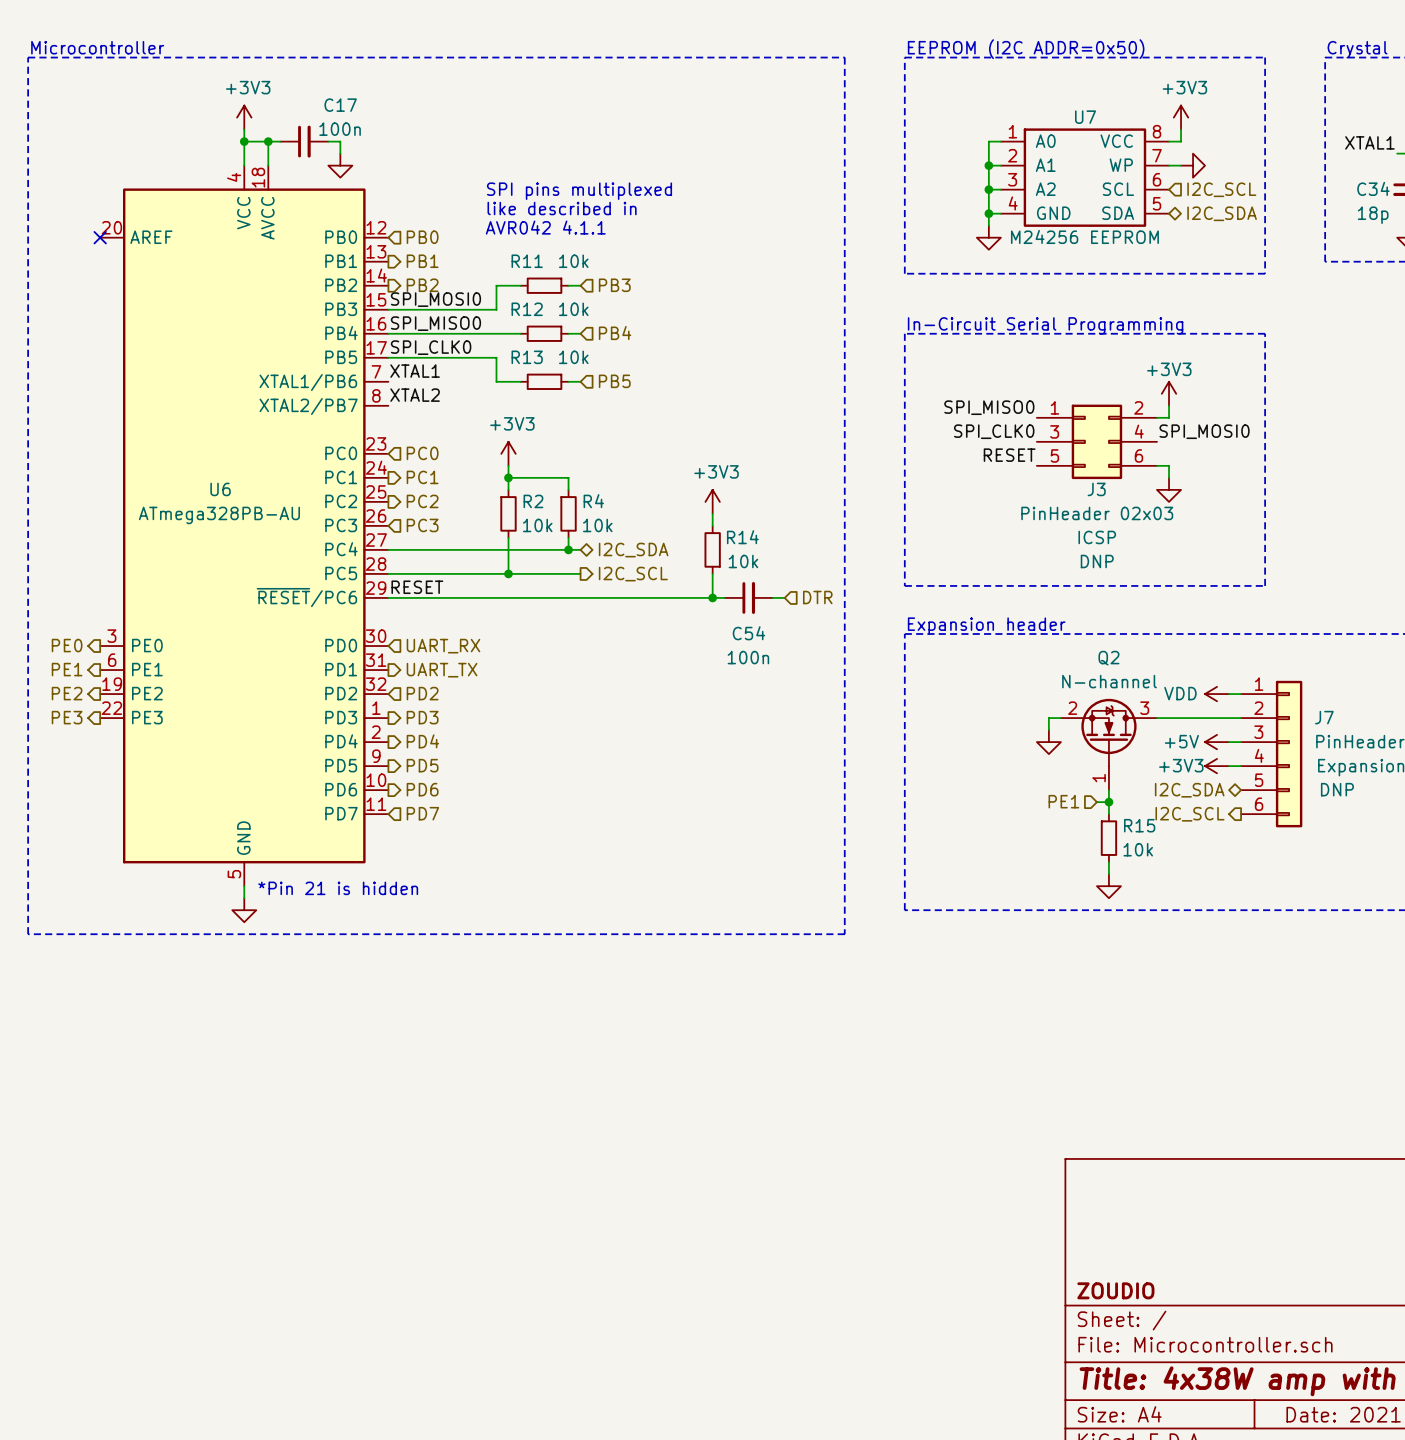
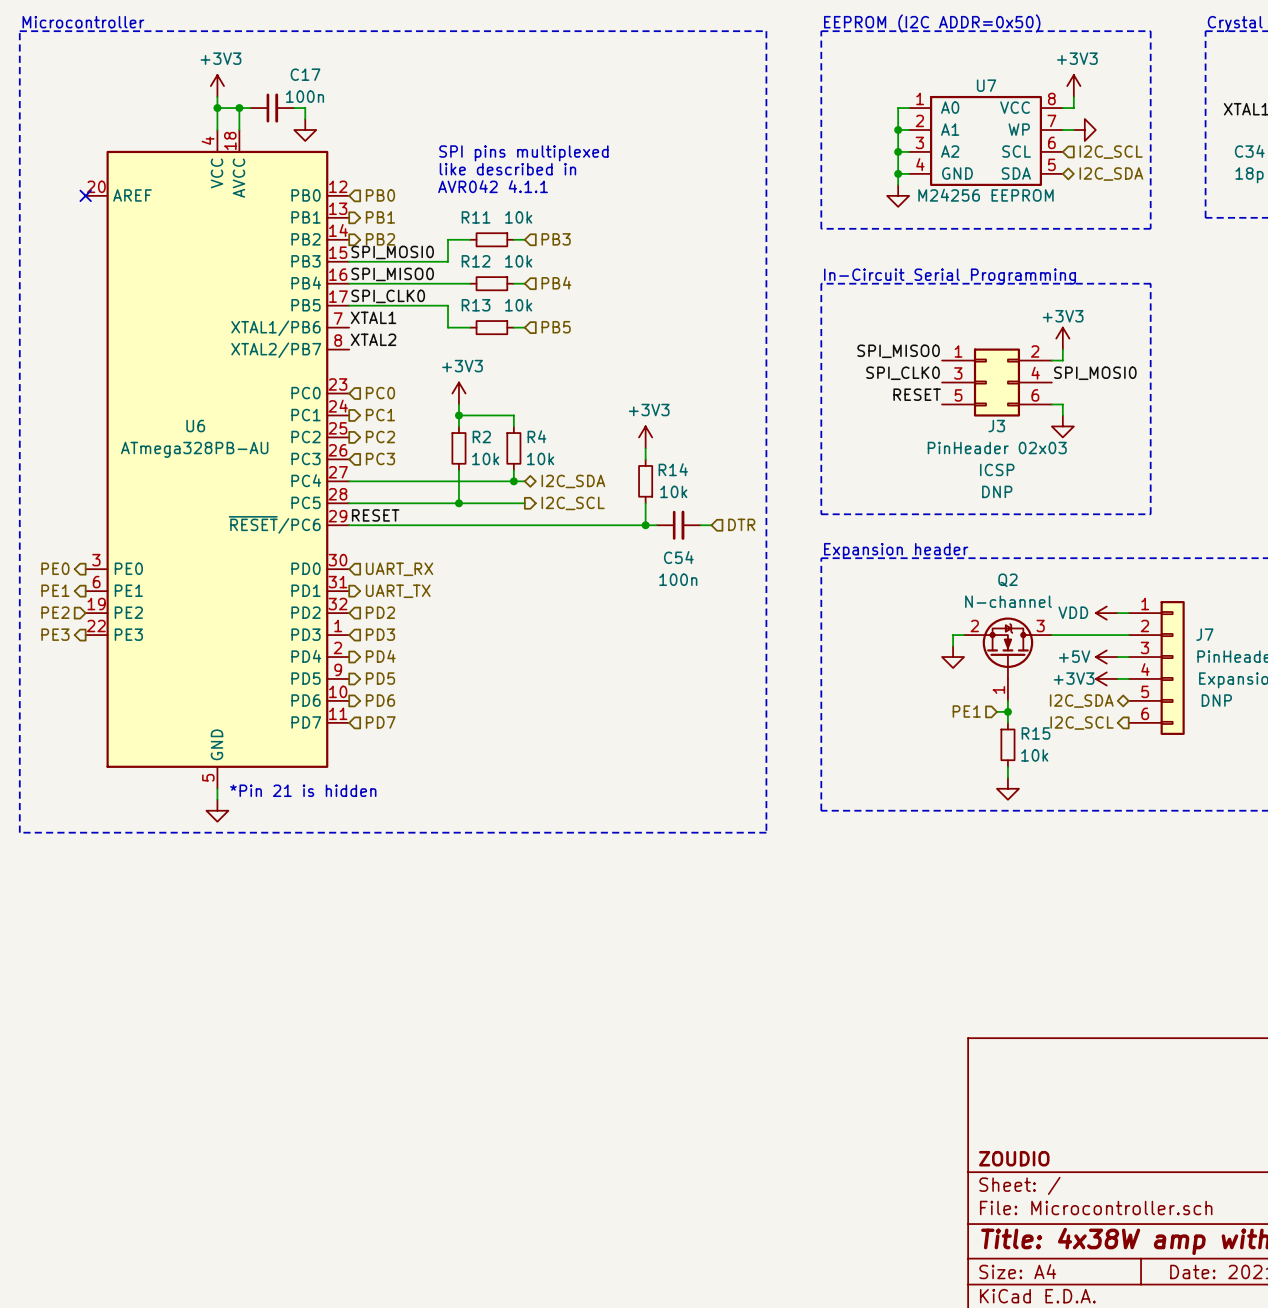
hierarchical label shape: output (67, 693) -> input (55, 612)
hierarchical label shape: output (422, 717) -> input (380, 634)

